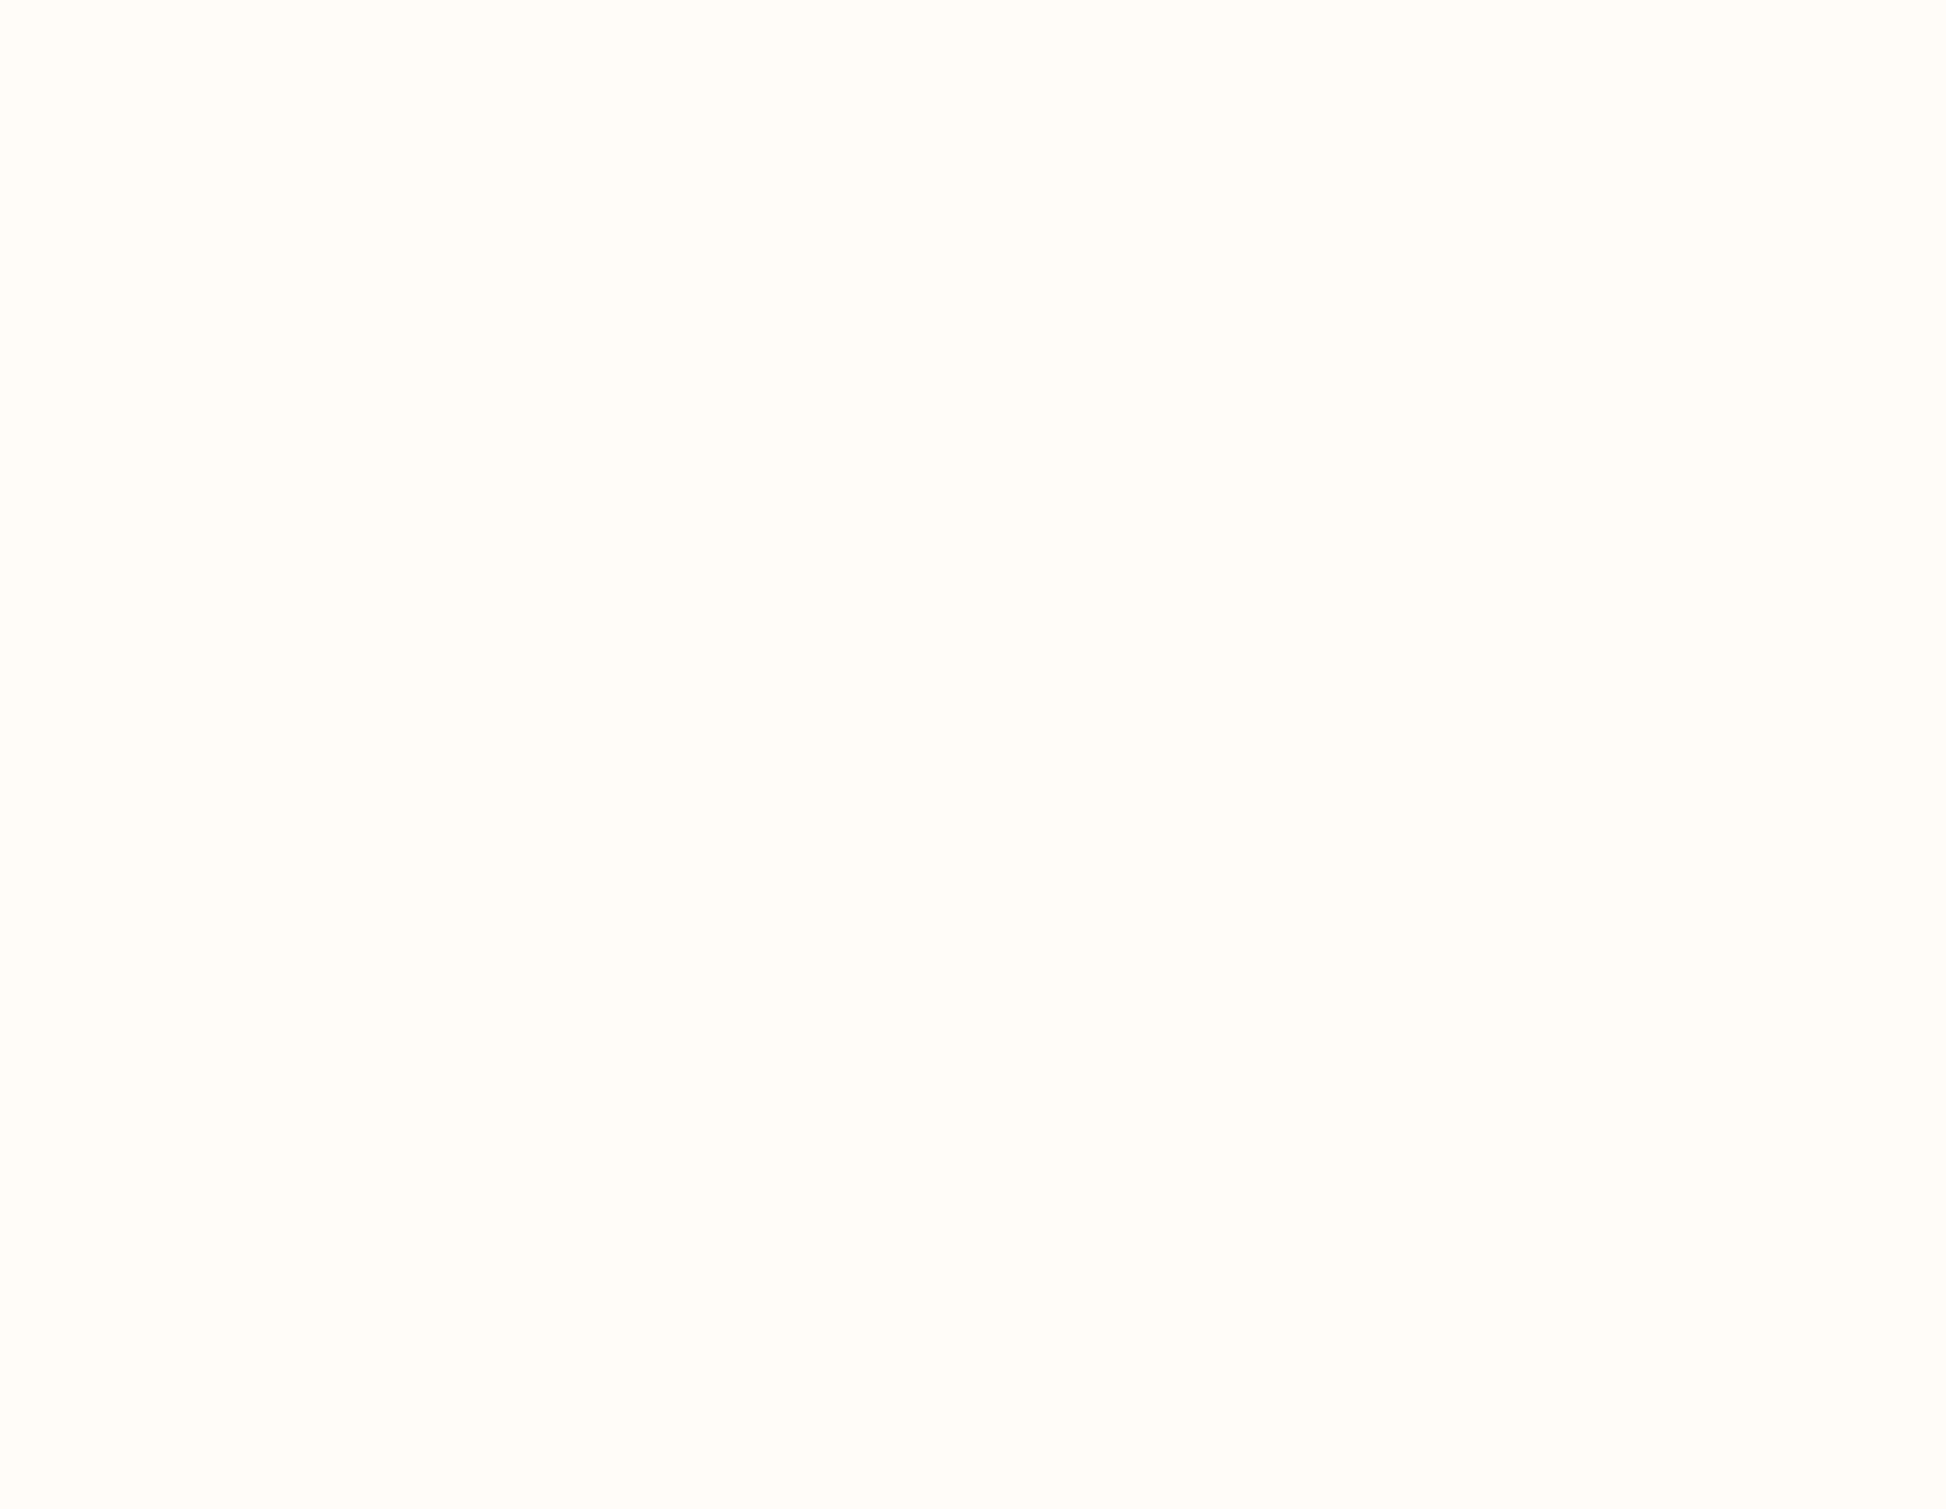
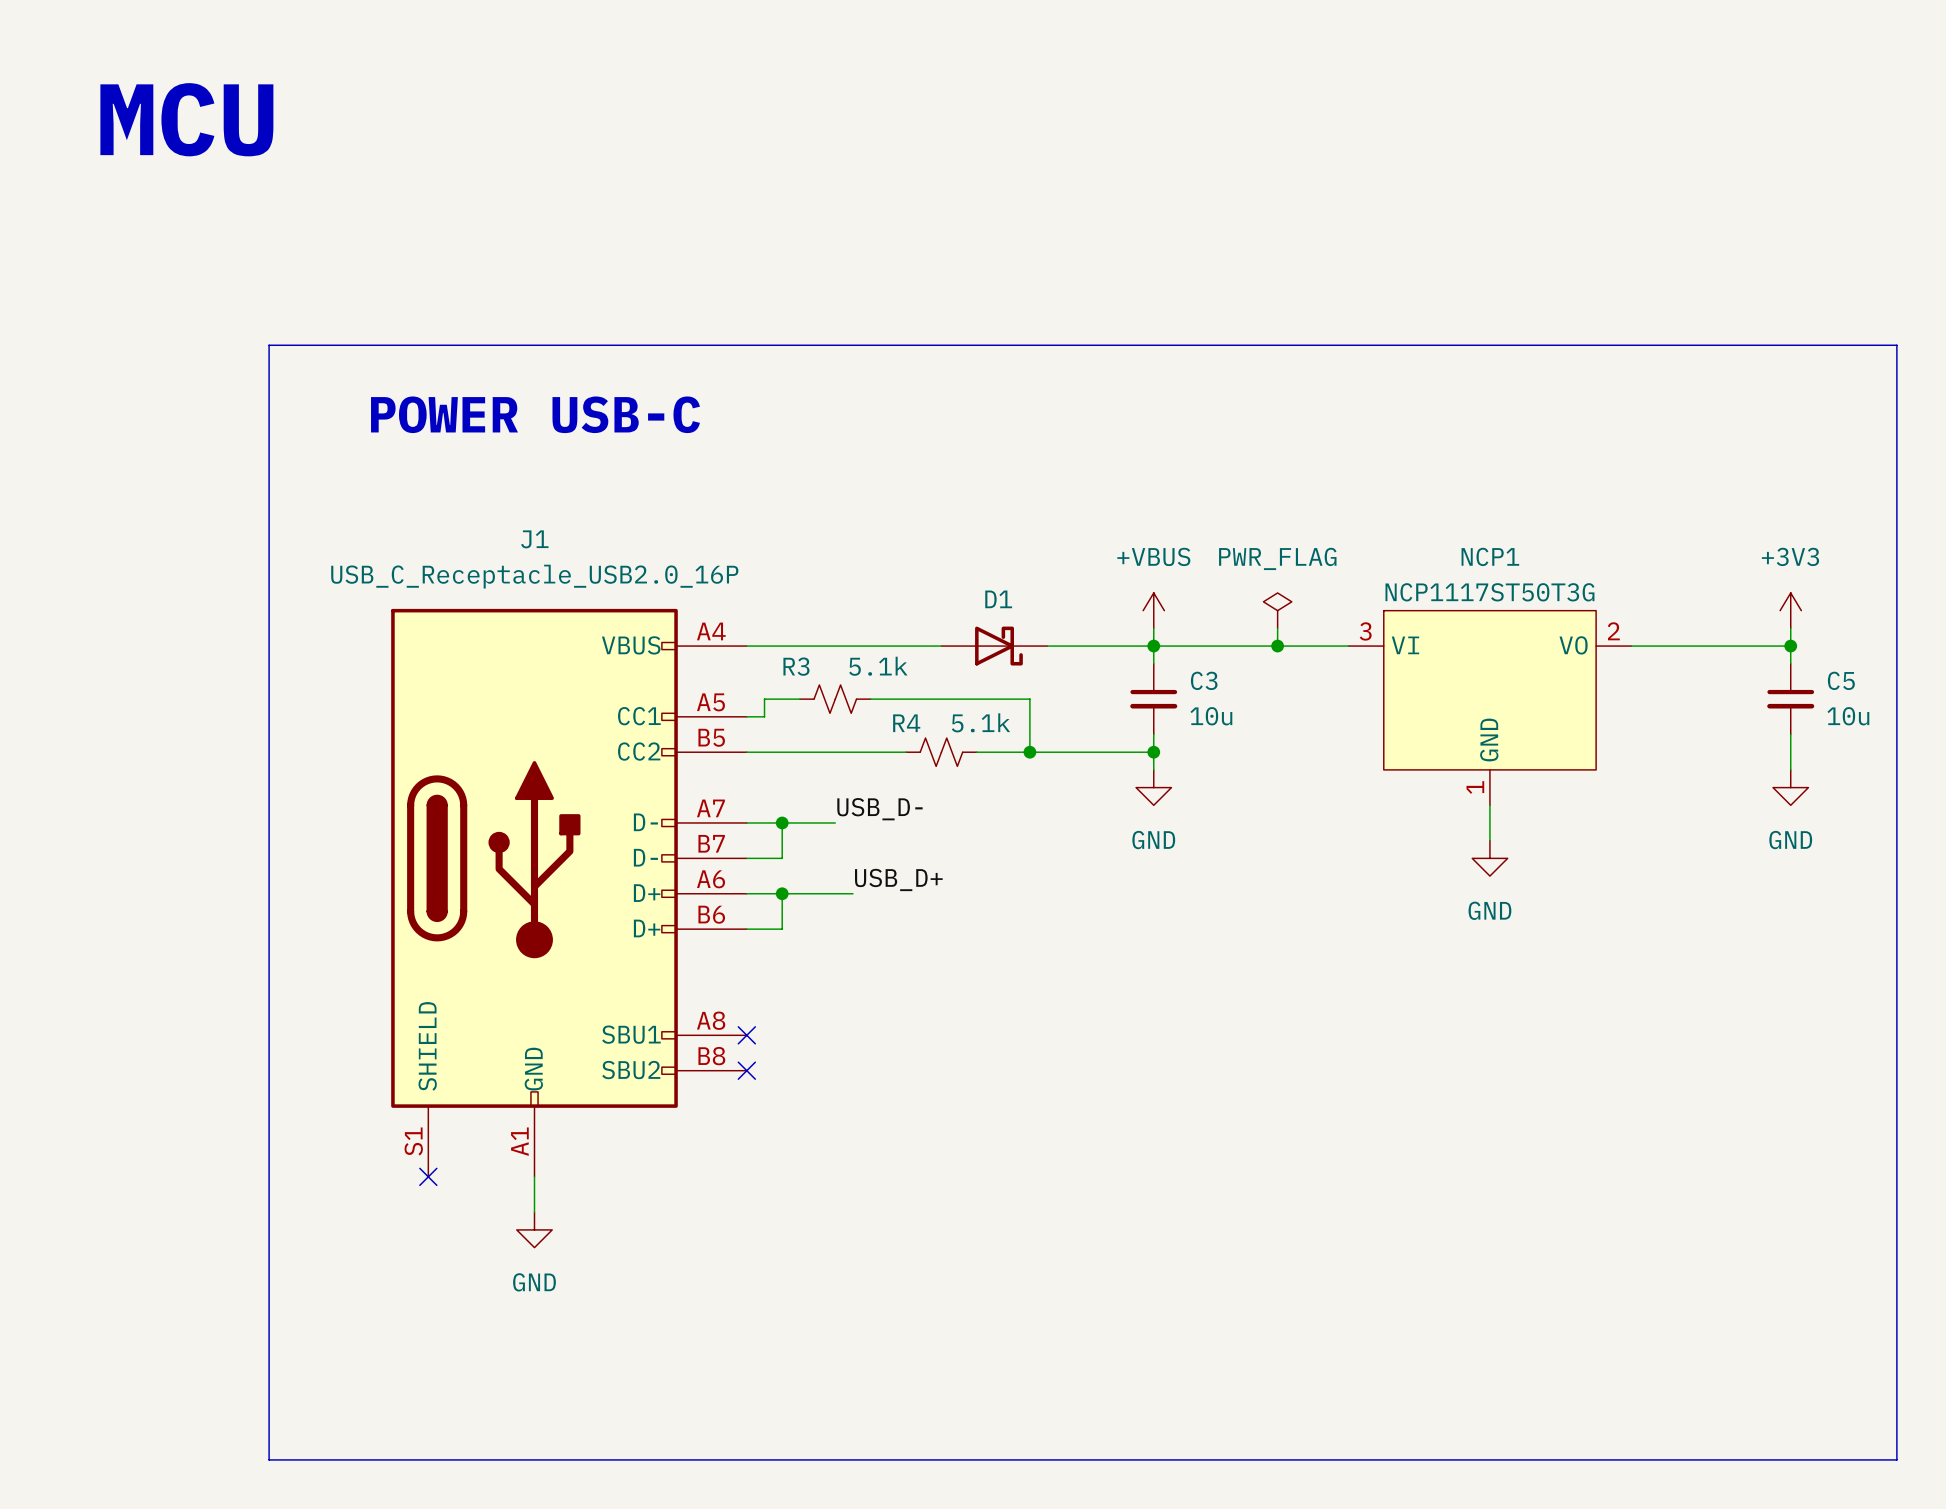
text: none -> MCU (186, 119)
line: none -> (269, 345) (1896, 345) (1896, 1459) (269, 1459) (269, 345)
text: none -> POWER USB-C (535, 414)
power symbol: none -> +VBUS (1153, 610)
power symbol: none -> PWR_FLAG (1277, 610)
power symbol: none -> +3V3 (1790, 610)
wire: none -> (1153, 628) (1153, 663)
wire: none -> (1277, 628) (1277, 646)
wire: none -> (1790, 628) (1790, 663)
wire: none -> (746, 646) (941, 646)
D1: none -> (994, 646)
wire: none -> (1047, 646) (1348, 646)
junction: none -> (1153, 646)
junction: none -> (1277, 646)
wire: none -> (1631, 646) (1790, 646)
junction: none -> (1790, 646)
wire: none -> (799, 699) (764, 699) (764, 716) (746, 716)
R3: none -> 5.1k (835, 699)
wire: none -> (870, 699) (1029, 699) (1029, 752)
C3: none -> 10u (1153, 699)
C5: none -> 10u (1790, 699)
NCP1: none -> NCP1117ST50T3G (1489, 707)
wire: none -> (1153, 734) (1153, 769)
wire: none -> (1790, 734) (1790, 769)
wire: none -> (746, 752) (906, 752)
R4: none -> 5.1k (941, 752)
wire: none -> (976, 752) (1153, 752)
junction: none -> (1029, 752)
junction: none -> (1153, 752)
power symbol: none -> GND (1153, 787)
power symbol: none -> GND (1790, 787)
wire: none -> (1489, 805) (1489, 840)
label: none -> USB_D- (879, 809)
wire: none -> (746, 822) (835, 822)
wire: none -> (782, 822) (782, 858) (746, 858)
junction: none -> (782, 822)
power symbol: none -> GND (1489, 858)
label: none -> USB_D+ (898, 879)
J1: none -> USB_C_Receptacle_USB2.0_16P (568, 892)
wire: none -> (746, 893) (852, 893)
wire: none -> (782, 893) (782, 929) (746, 929)
junction: none -> (782, 893)
no-connect mark: none -> (746, 1035)
no-connect mark: none -> (746, 1070)
no-connect mark: none -> (428, 1176)
wire: none -> (534, 1176) (534, 1212)
power symbol: none -> GND (534, 1229)

